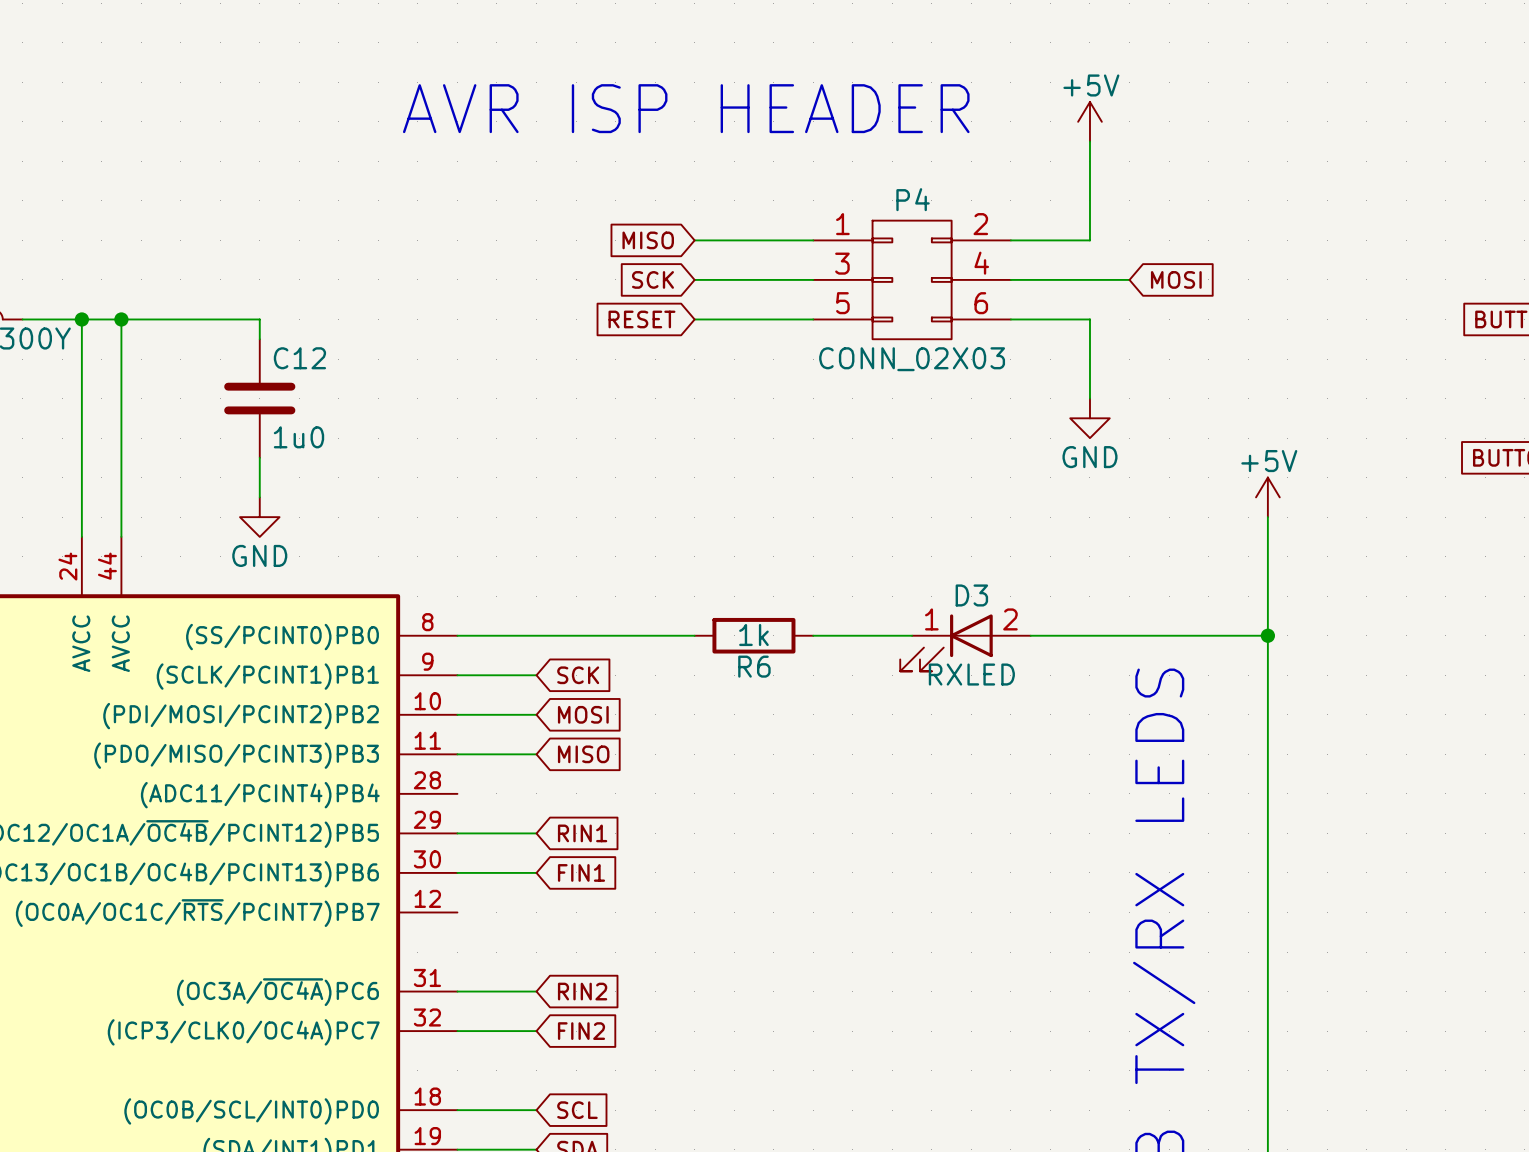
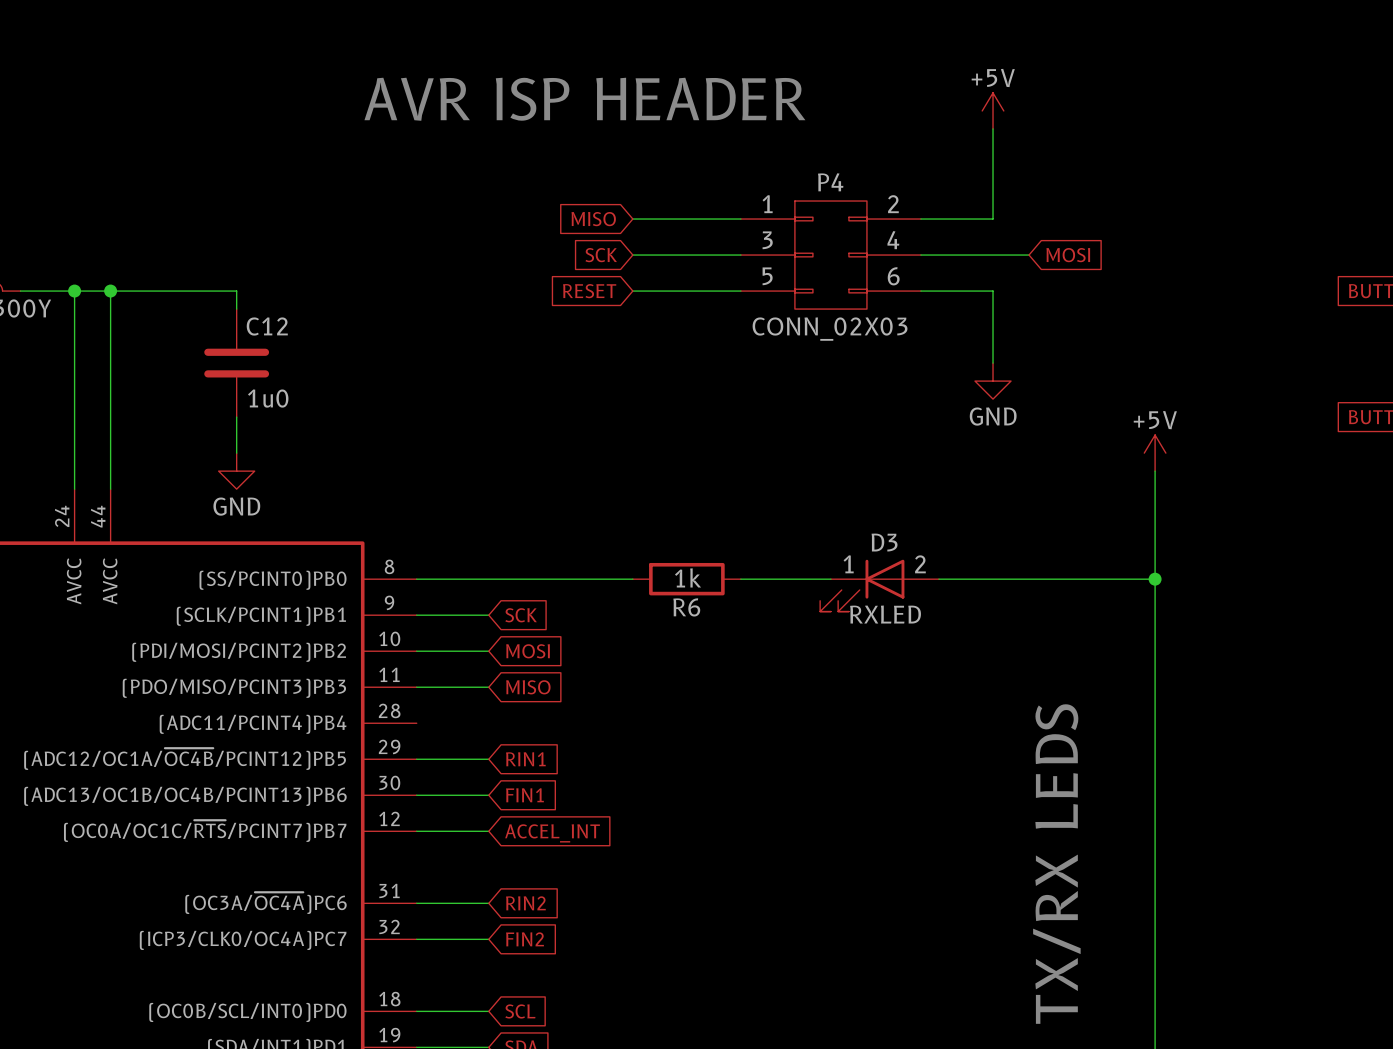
wire: none -> (416, 831) (488, 831)
global label: none -> ACCEL_INT (552, 833)

